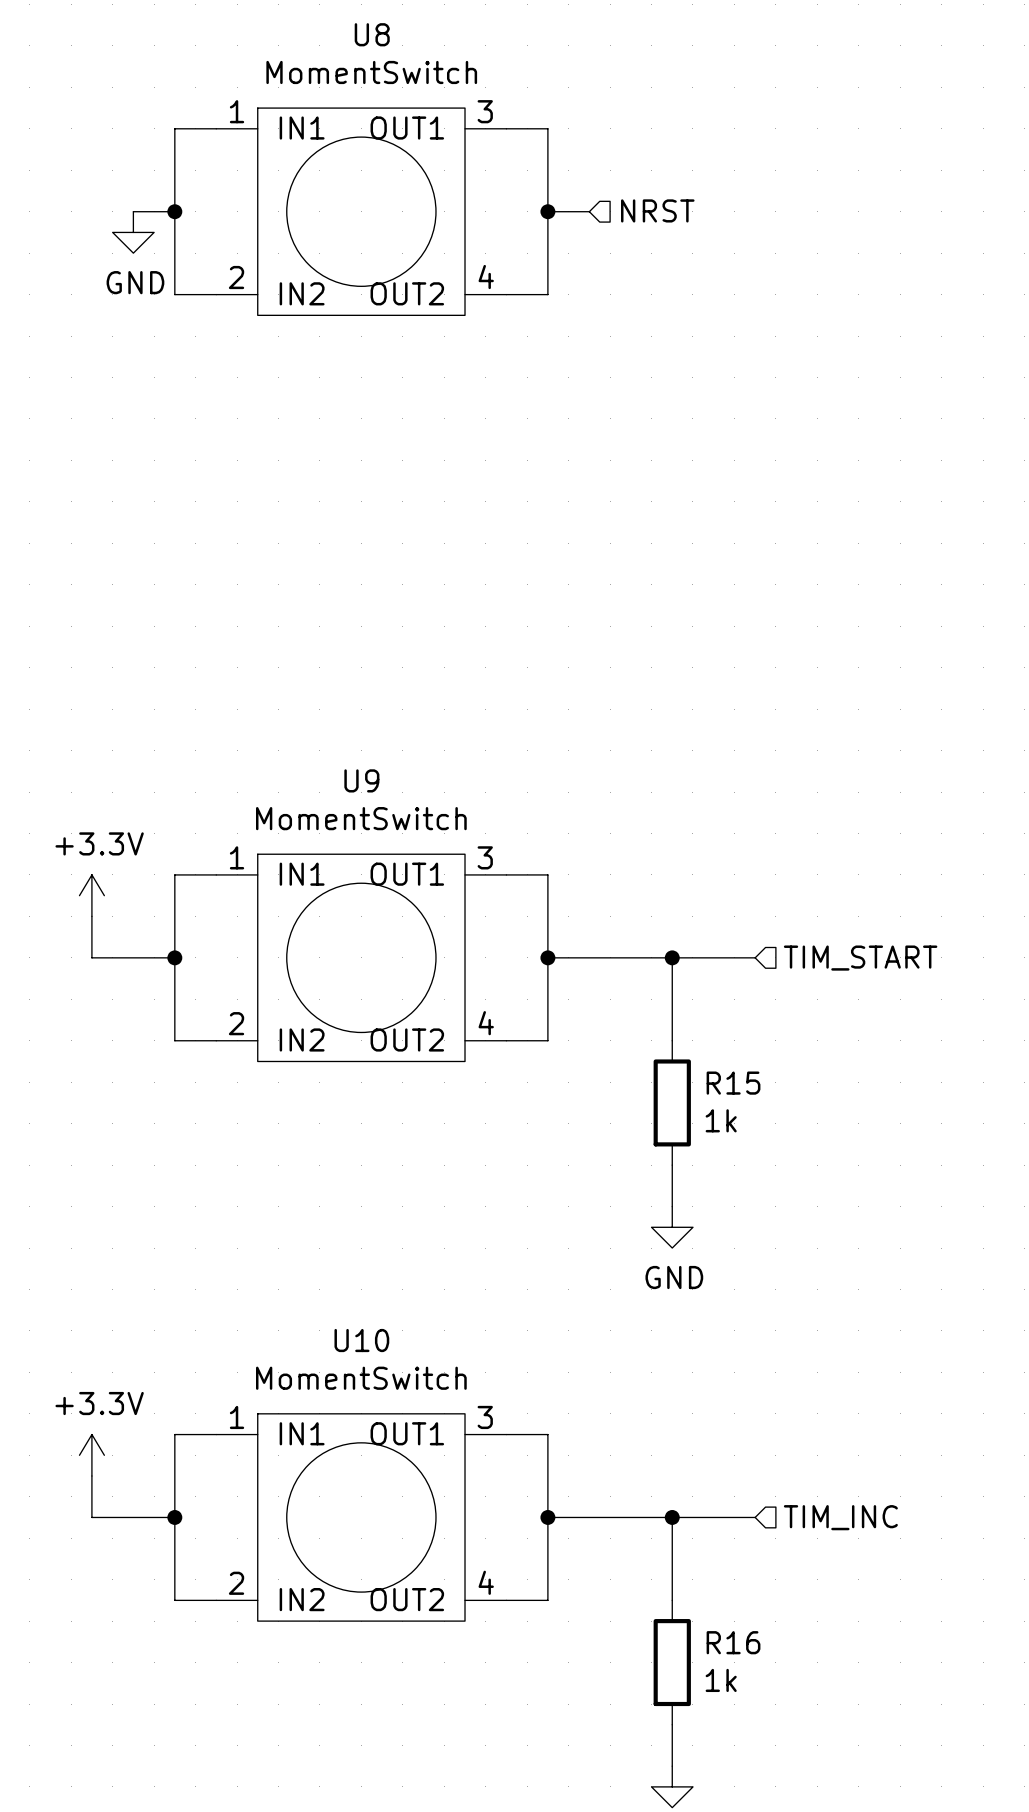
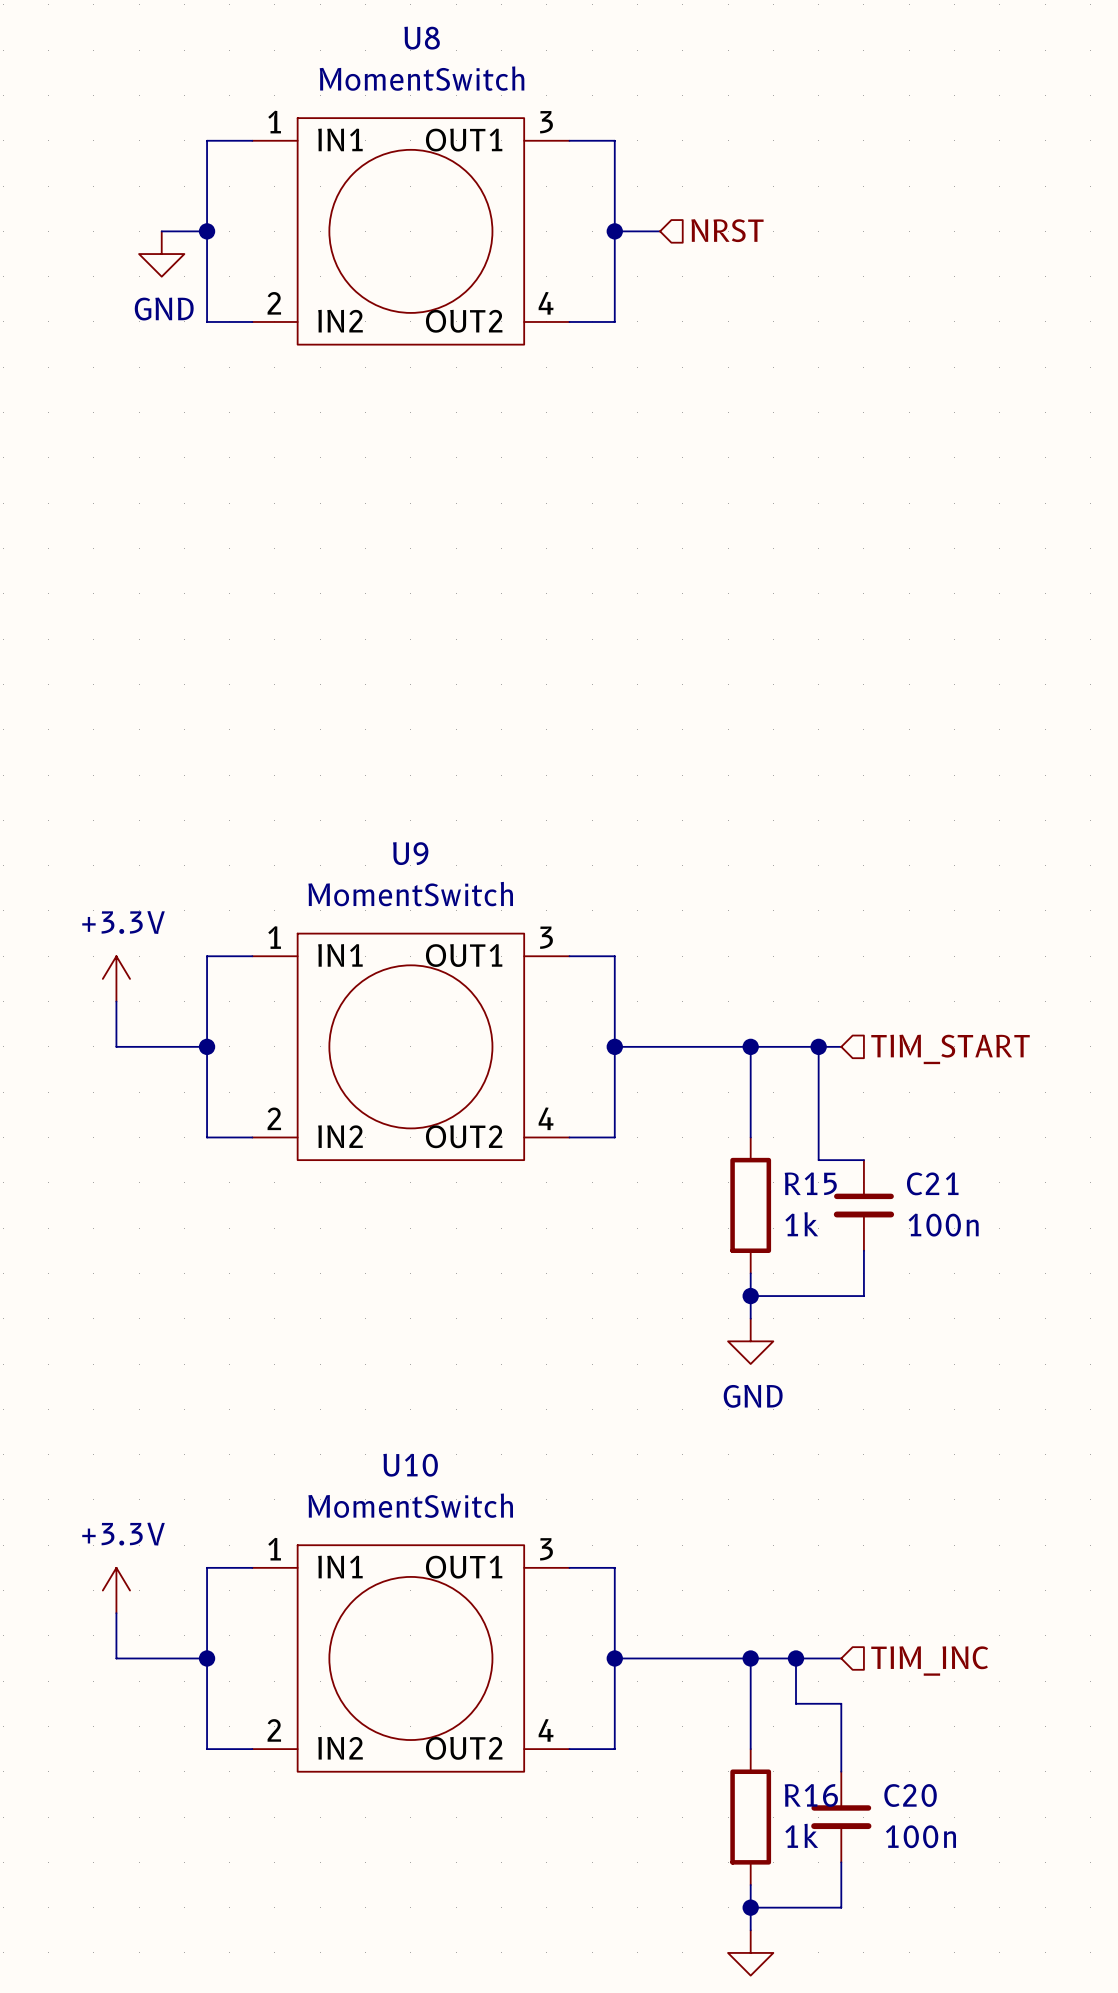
wire: none -> (818, 1046) (818, 1160) (863, 1160)
junction: none -> (818, 1046)
C21: none -> 100n (863, 1205)
wire: none -> (863, 1250) (863, 1296) (750, 1296)
junction: none -> (750, 1296)
wire: none -> (796, 1658) (796, 1703) (841, 1703) (841, 1771)
junction: none -> (796, 1658)
C20: none -> 100n (841, 1817)
wire: none -> (841, 1862) (841, 1907) (750, 1907)
junction: none -> (750, 1907)

